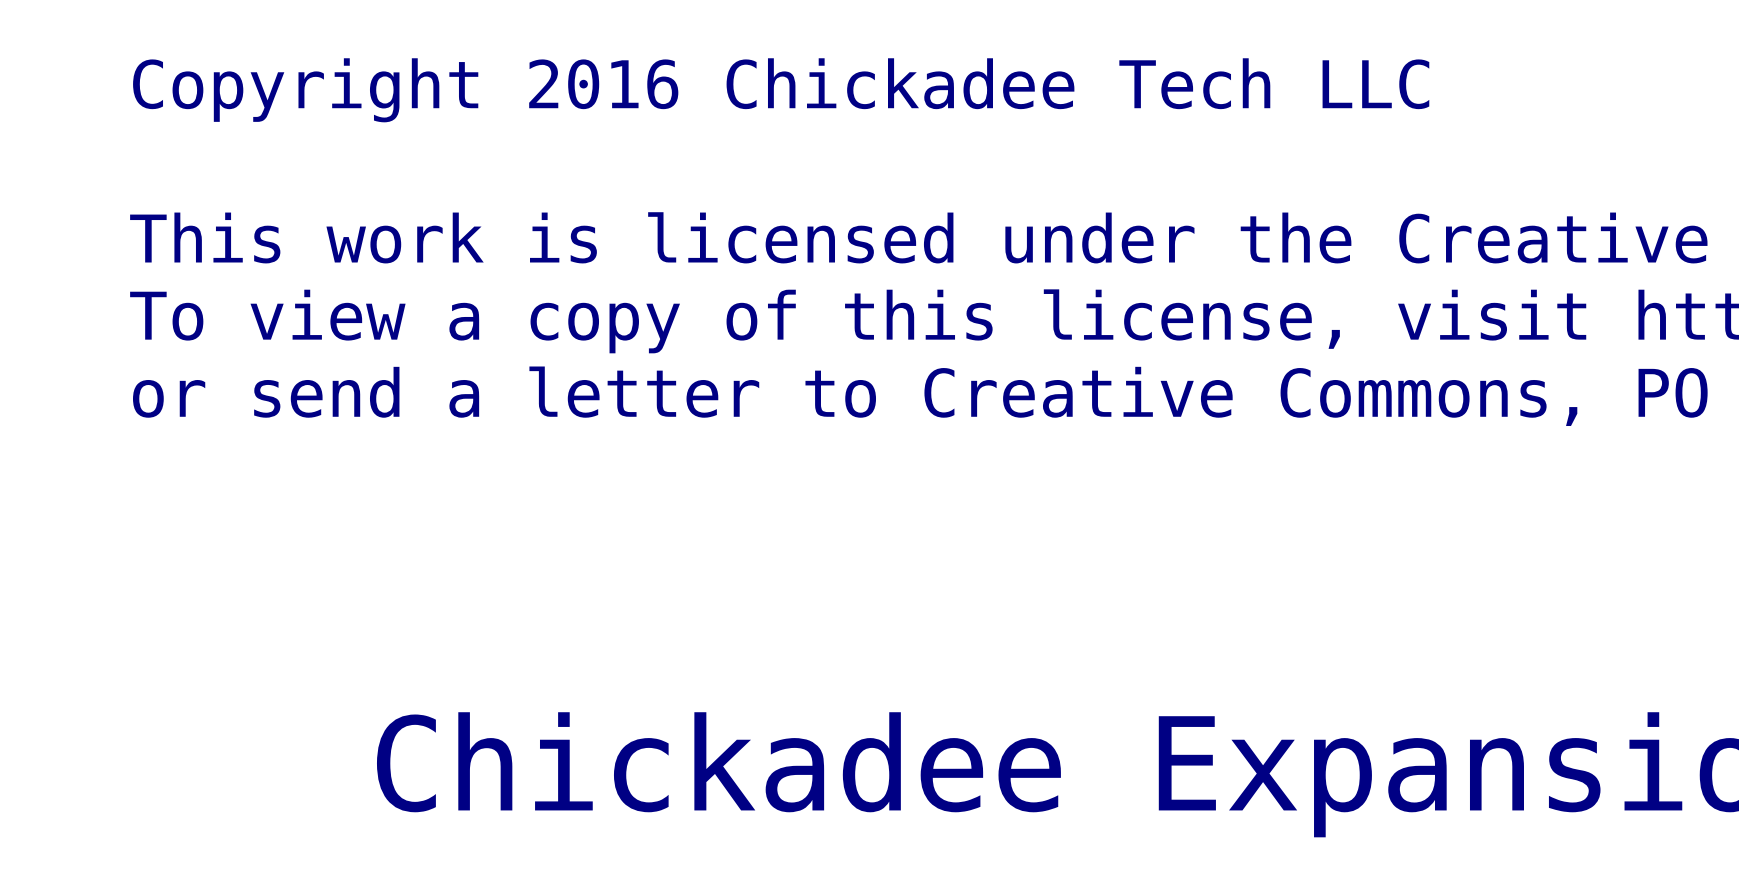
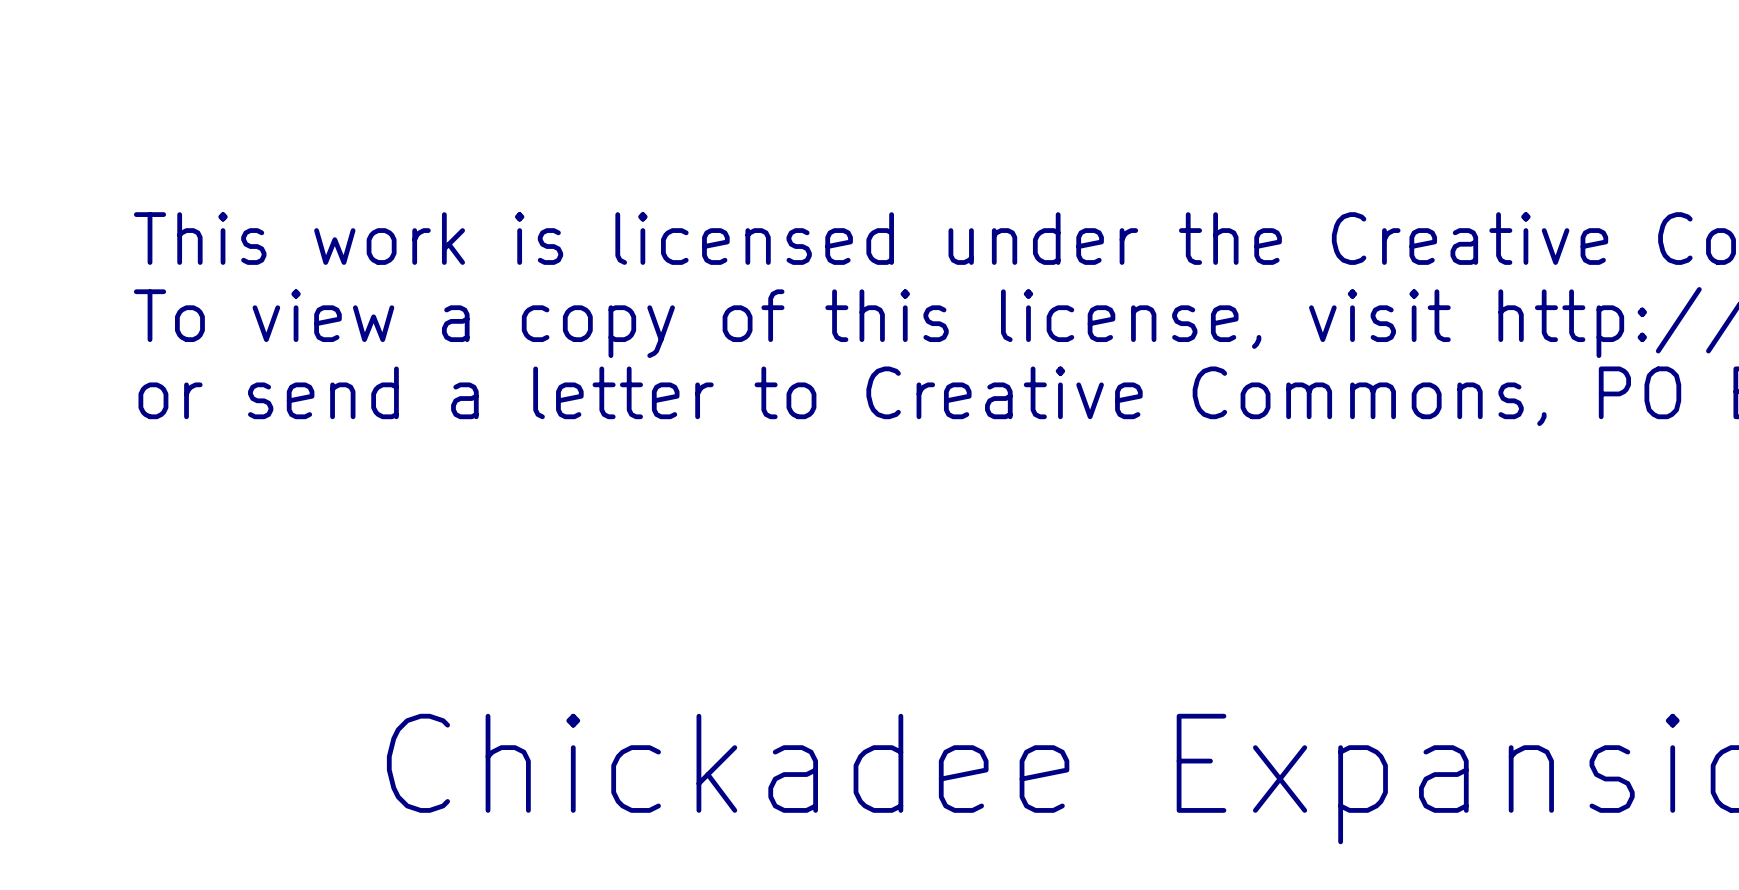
text: Copyright 2016 Chickadee Tech LLC (781, 90) -> none

